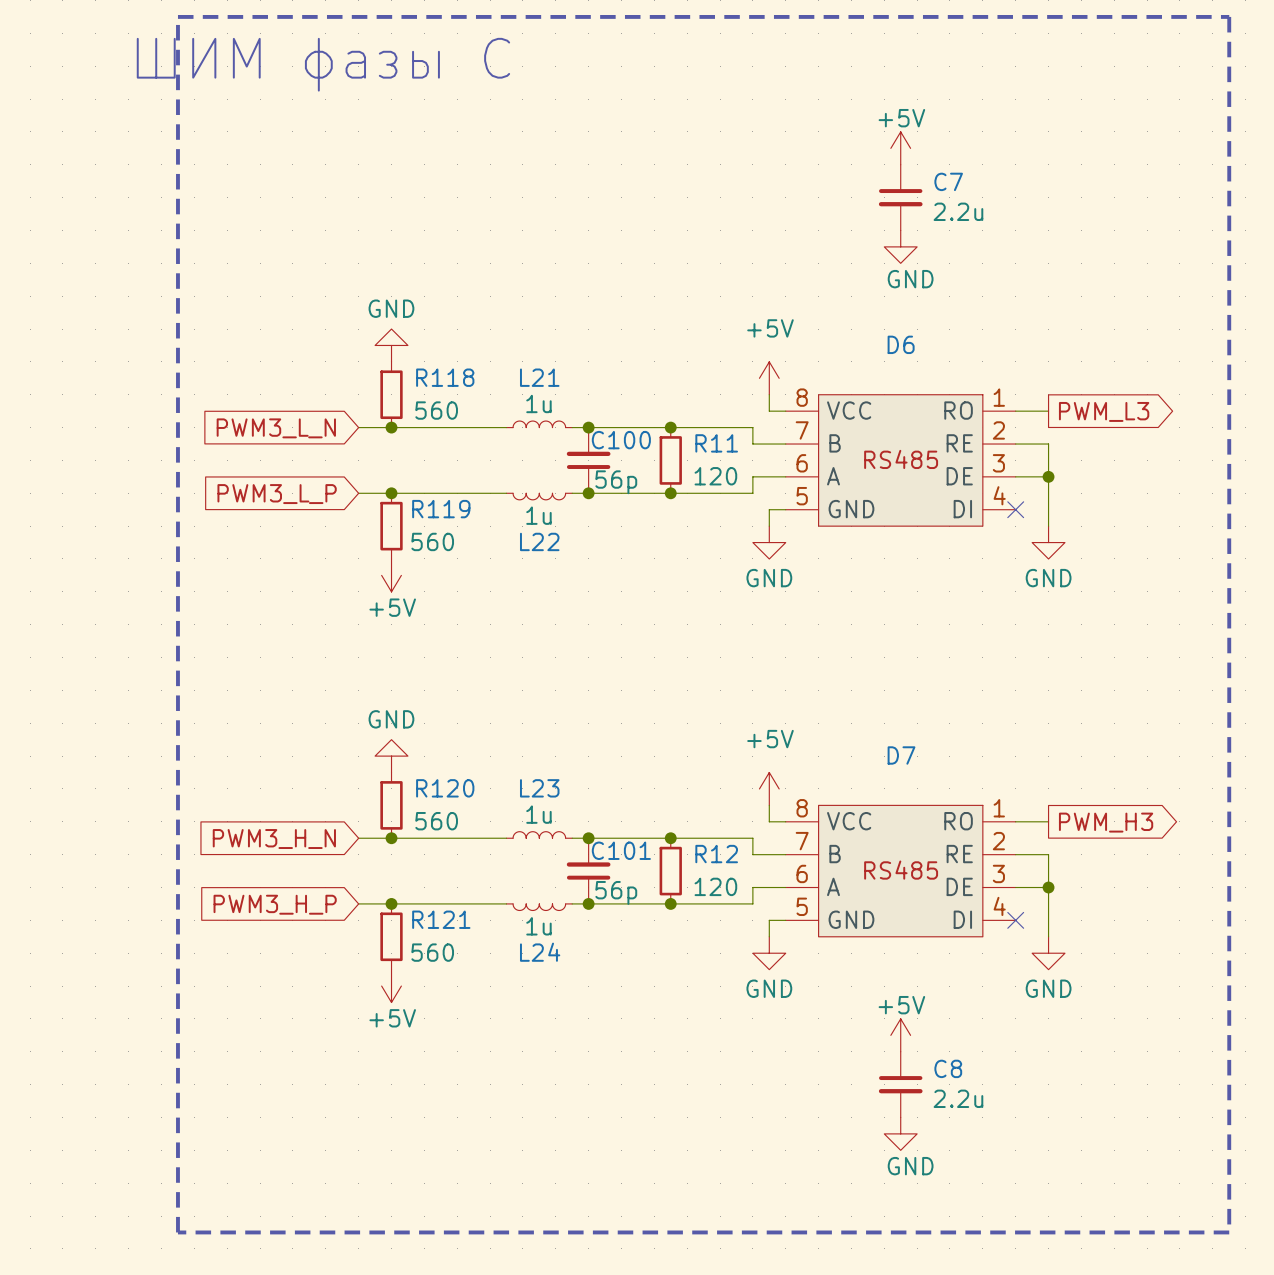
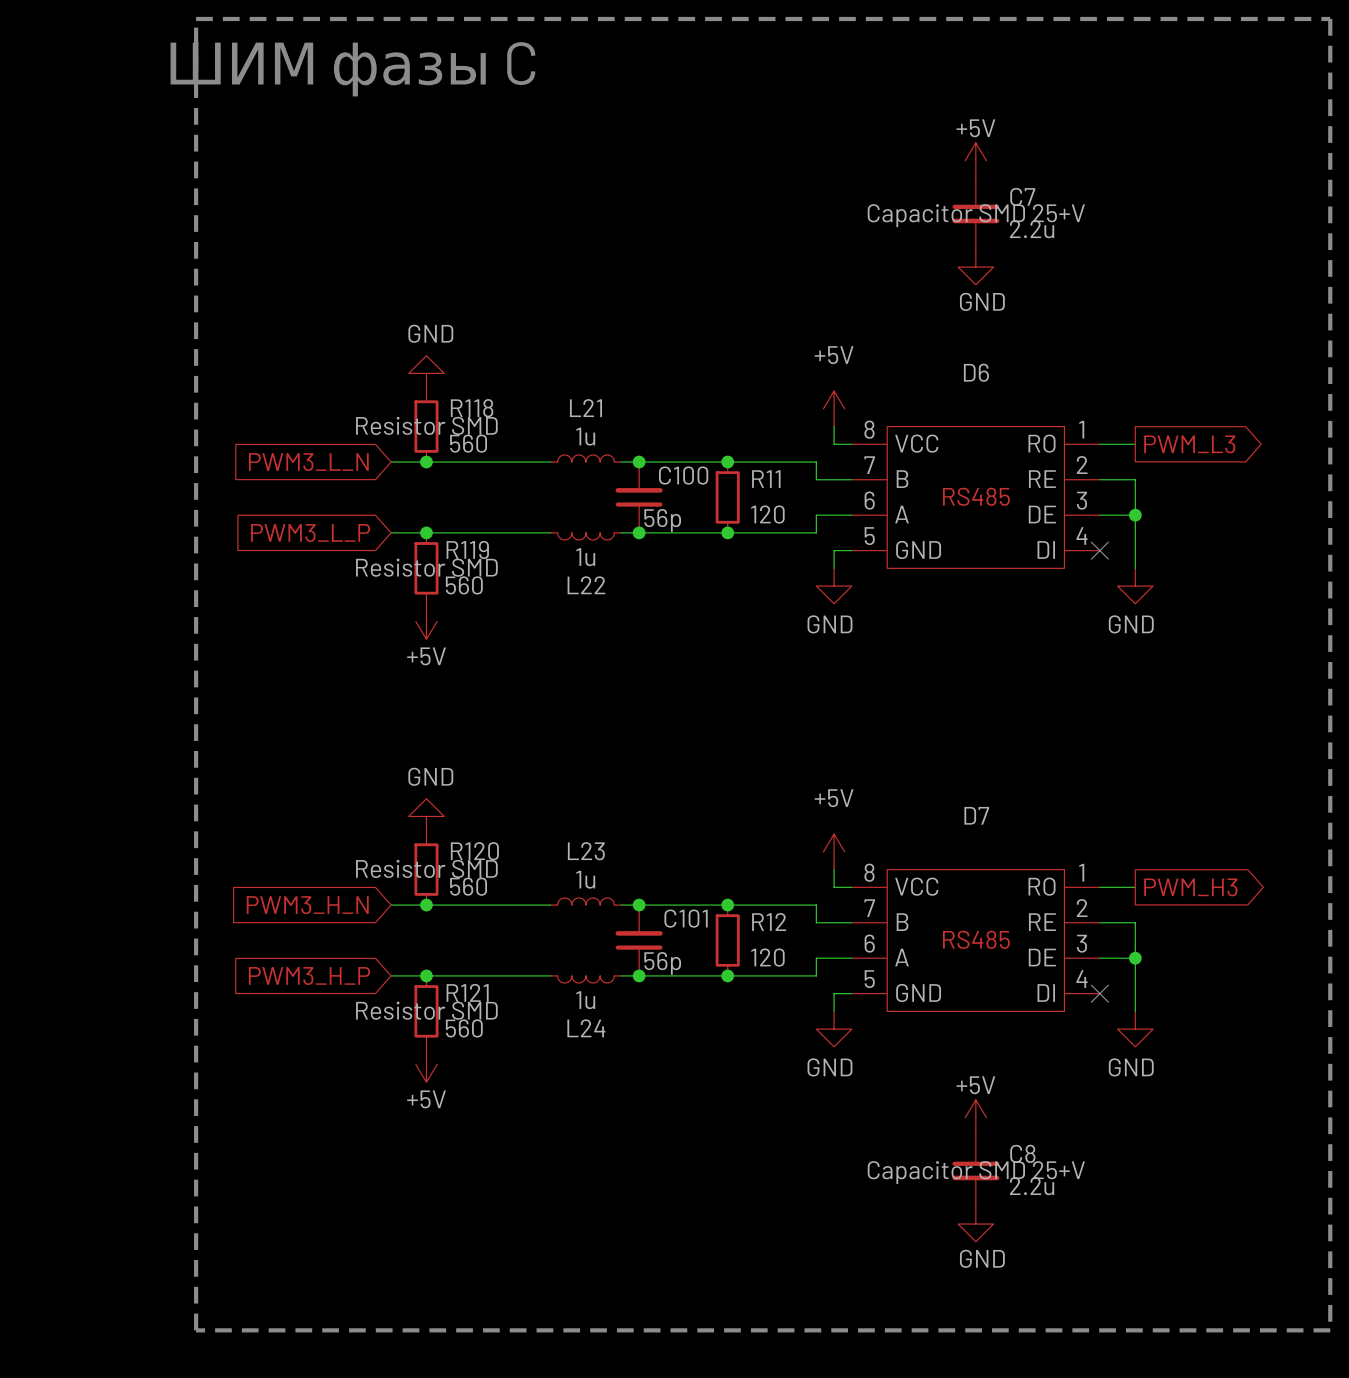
C7 text: none -> Capacitor SMD 25+V (976, 215)
R118 text: none -> Resistor SMD (426, 425)
R119 text: none -> Resistor SMD (426, 567)
R120 text: none -> Resistor SMD (426, 868)
R121 text: none -> Resistor SMD (426, 1010)
C8 text: none -> Capacitor SMD 25+V (976, 1172)

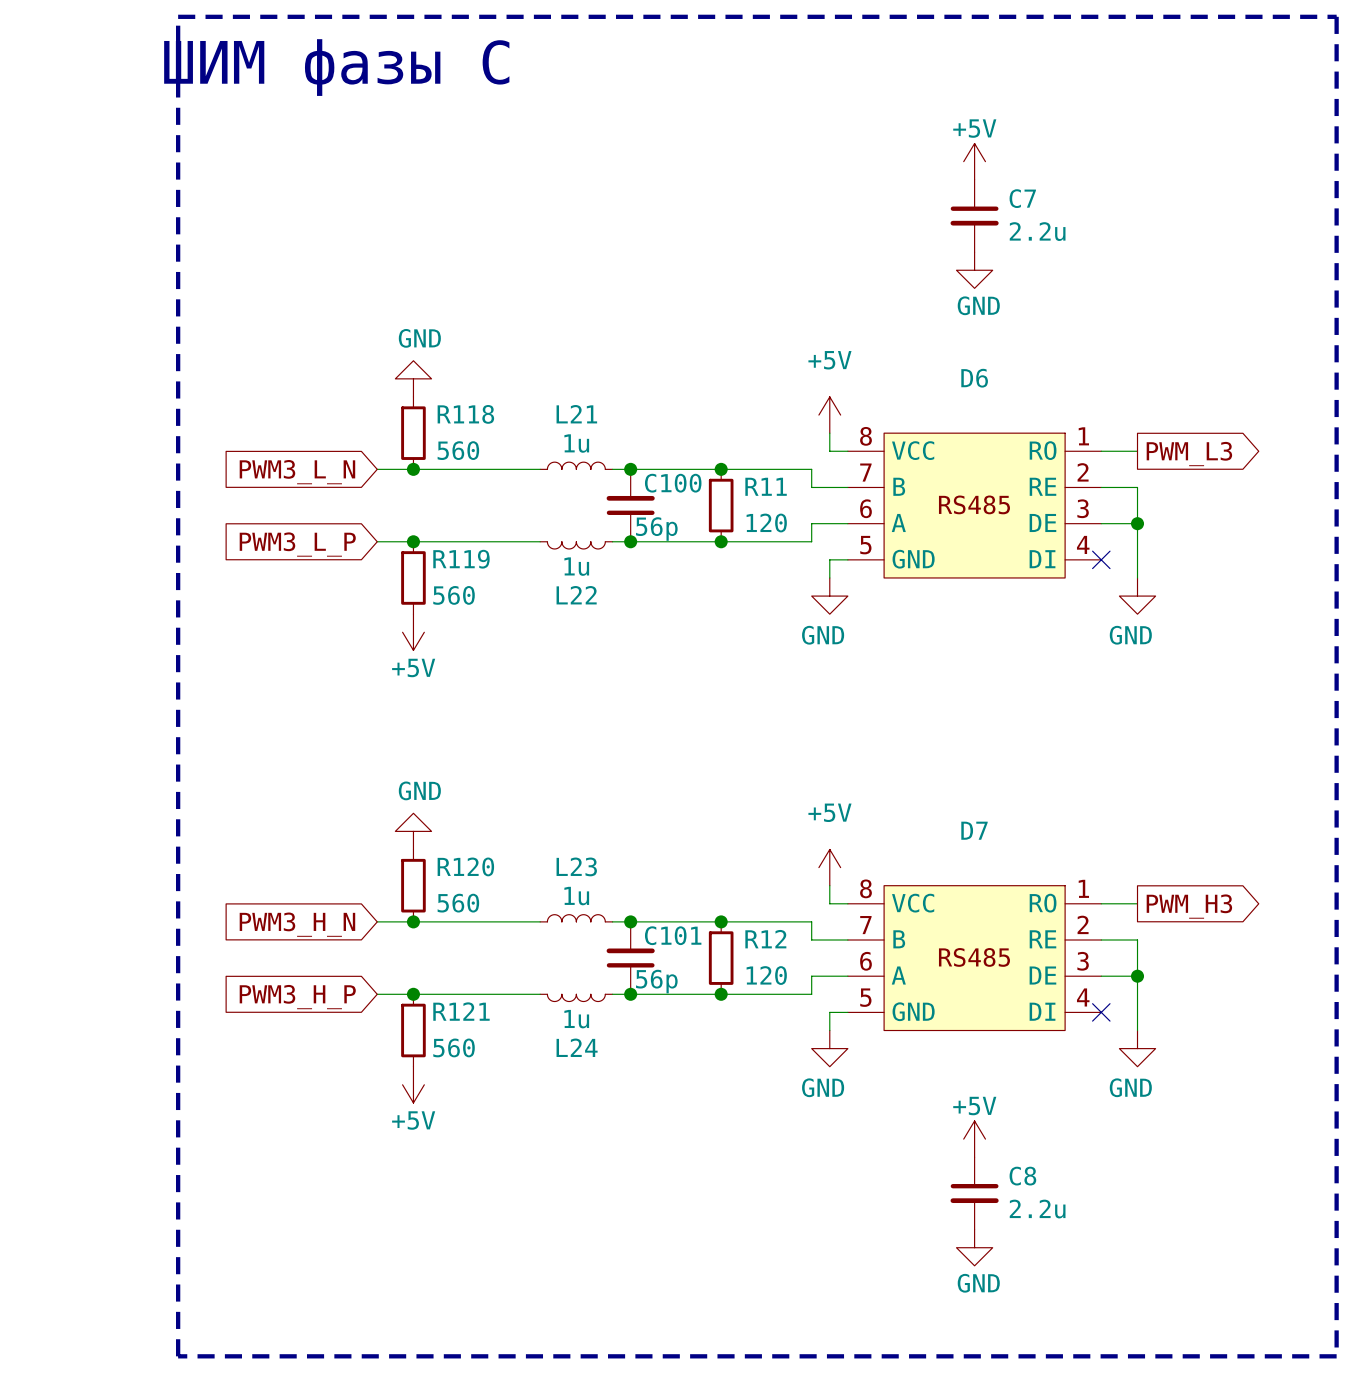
C7 text: Capacitor SMD 25+V (976, 215) -> none
R118 text: Resistor SMD (426, 425) -> none
R119 text: Resistor SMD (426, 567) -> none
R120 text: Resistor SMD (426, 868) -> none
R121 text: Resistor SMD (426, 1010) -> none
C8 text: Capacitor SMD 25+V (976, 1172) -> none

